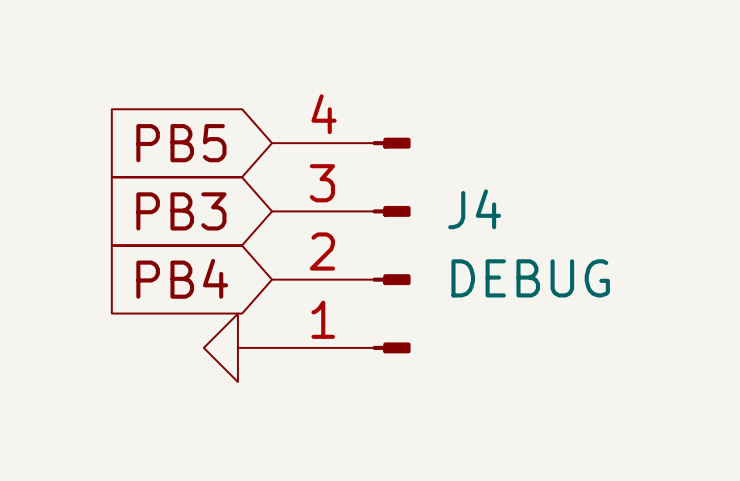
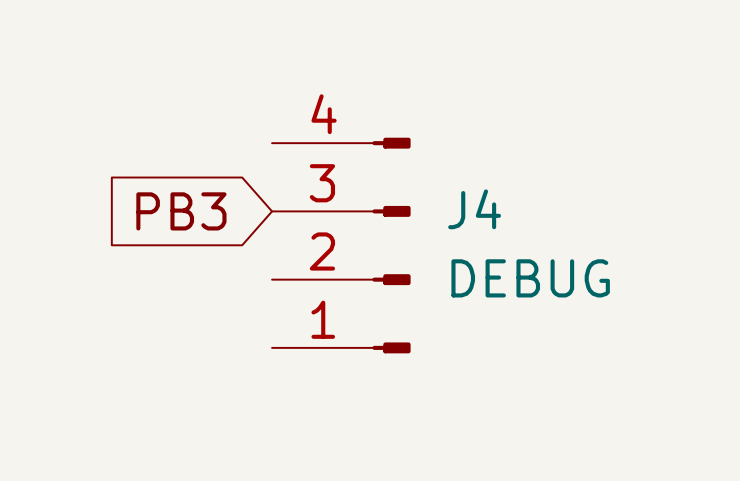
global label: PB5 (181, 143) -> none
global label: PB4 (182, 278) -> none
power symbol: (237, 347) -> none

